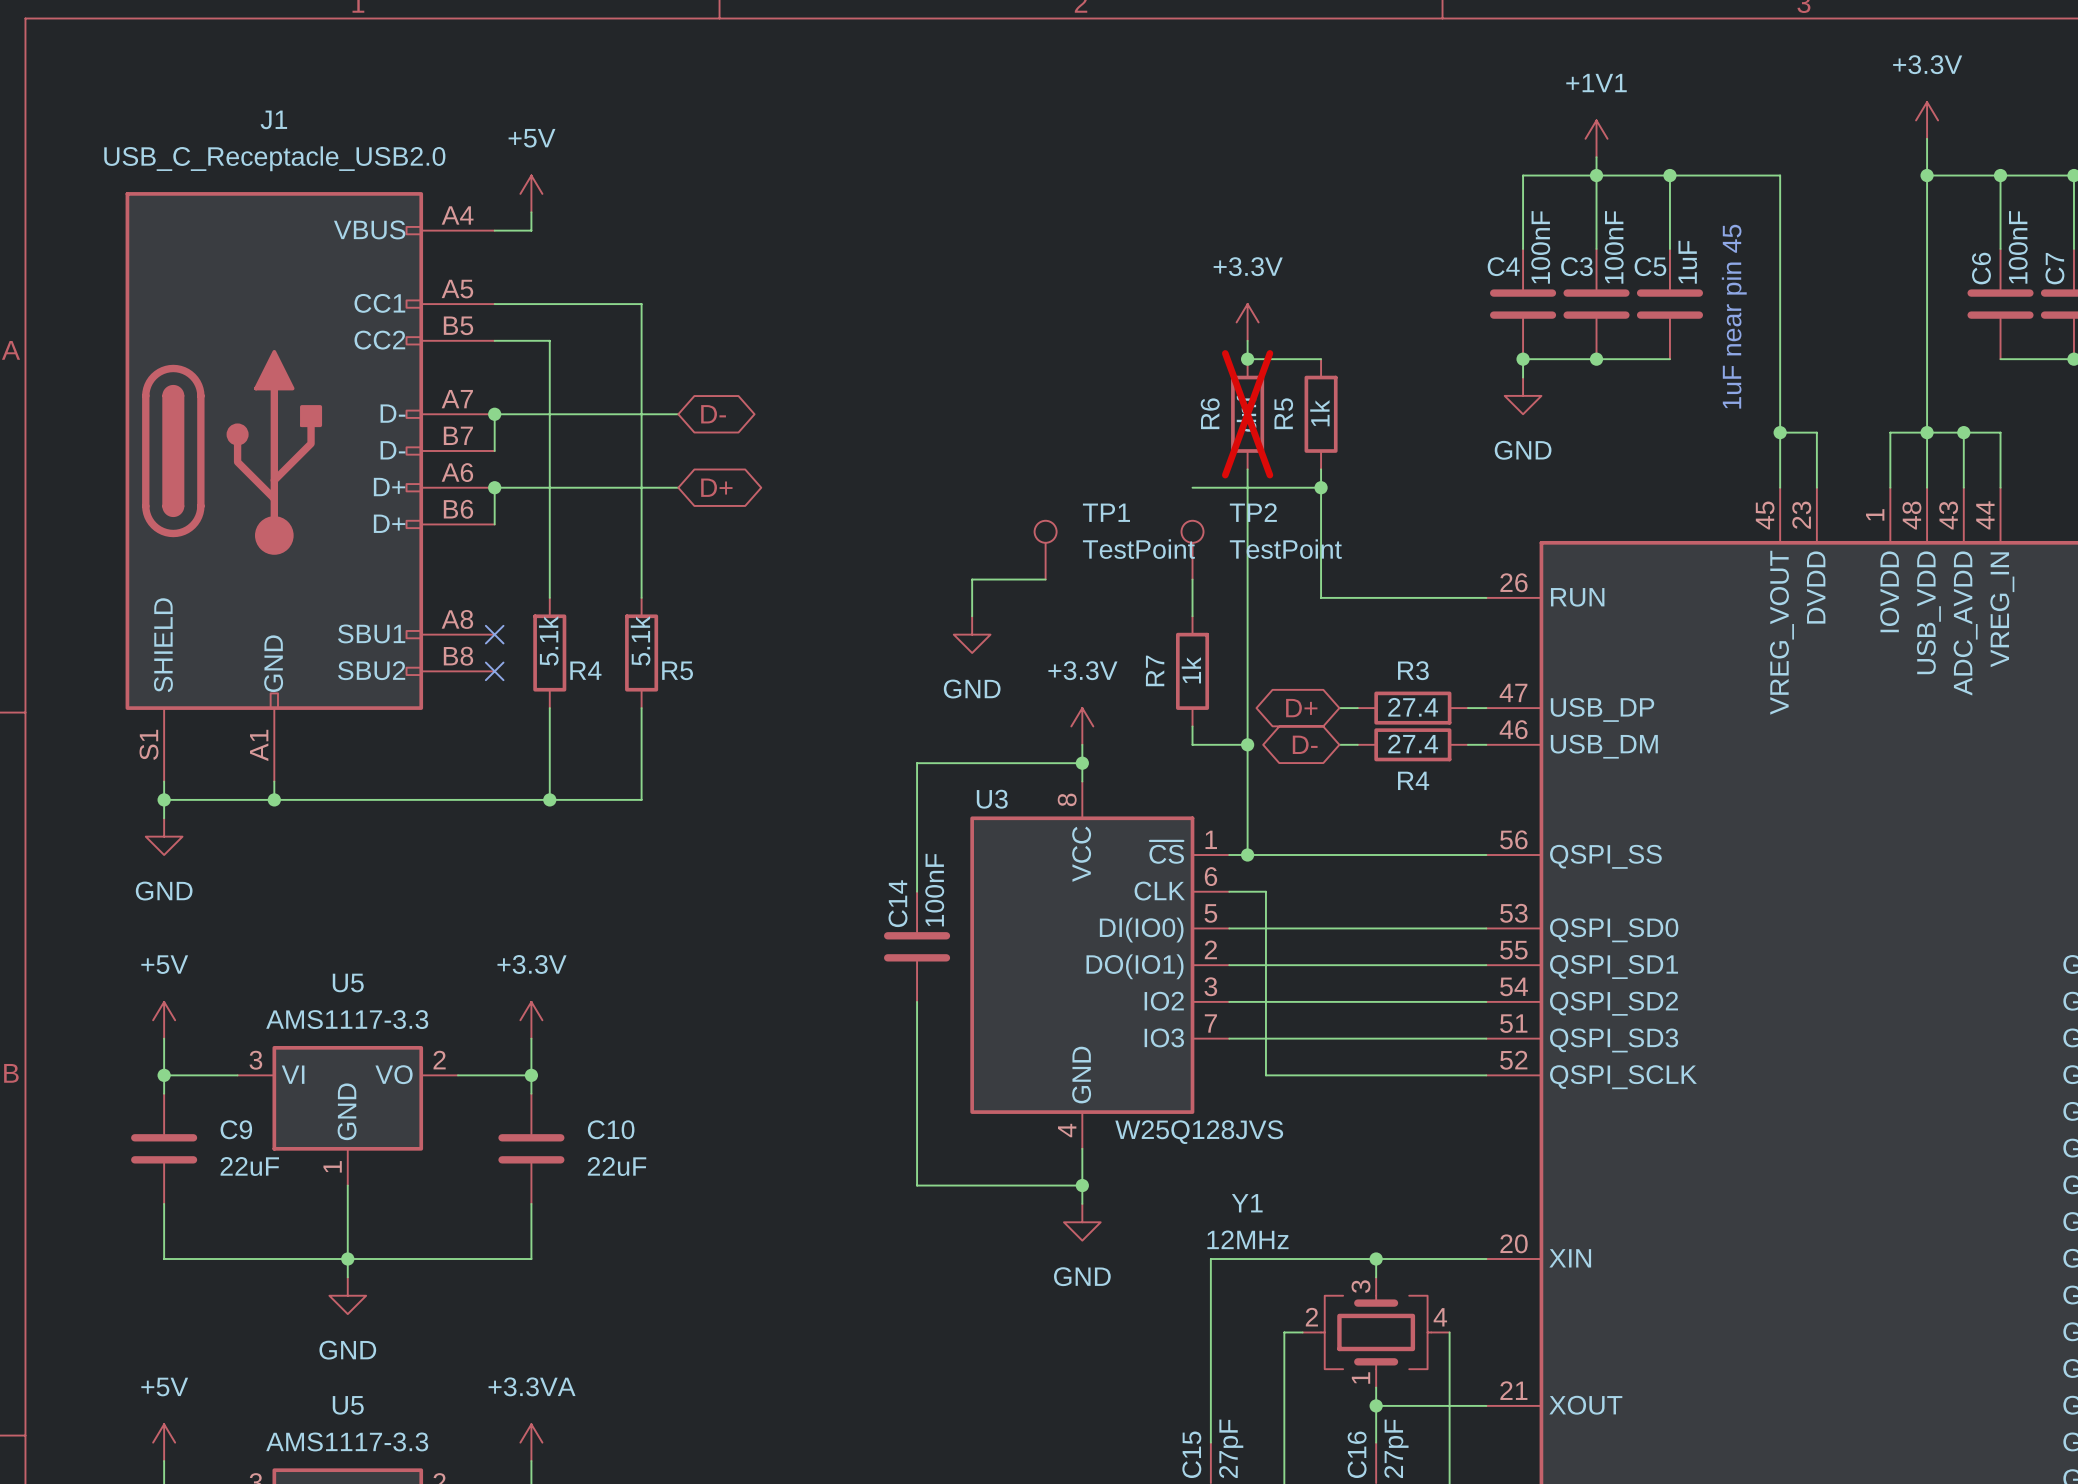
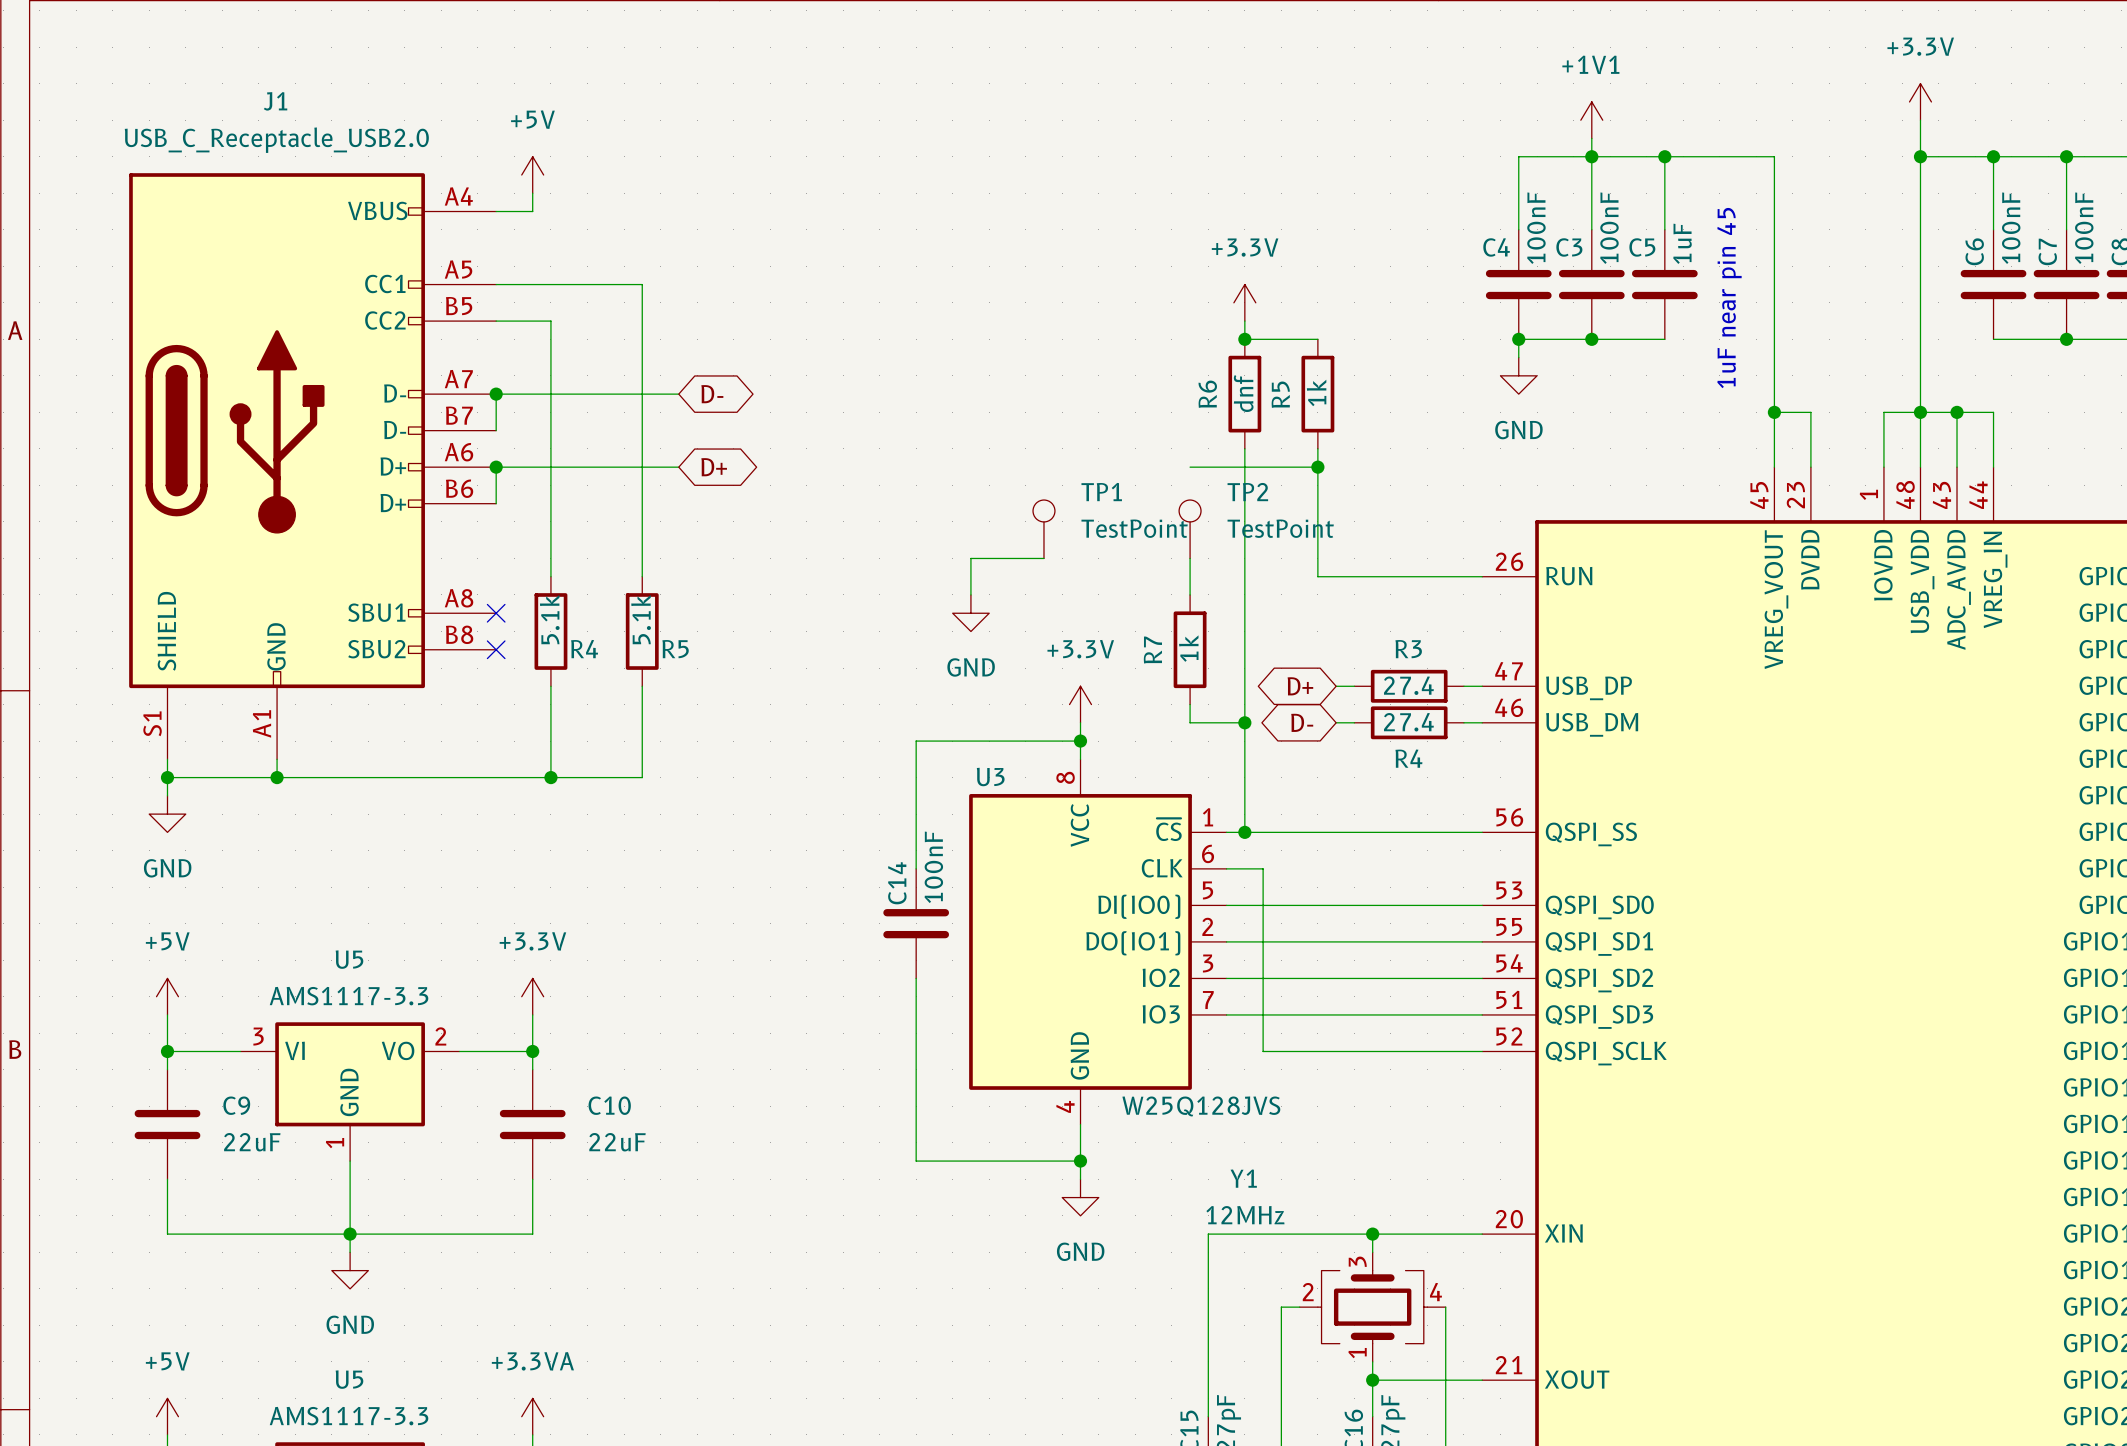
R6 do-not-place cross: (1247, 414) -> none

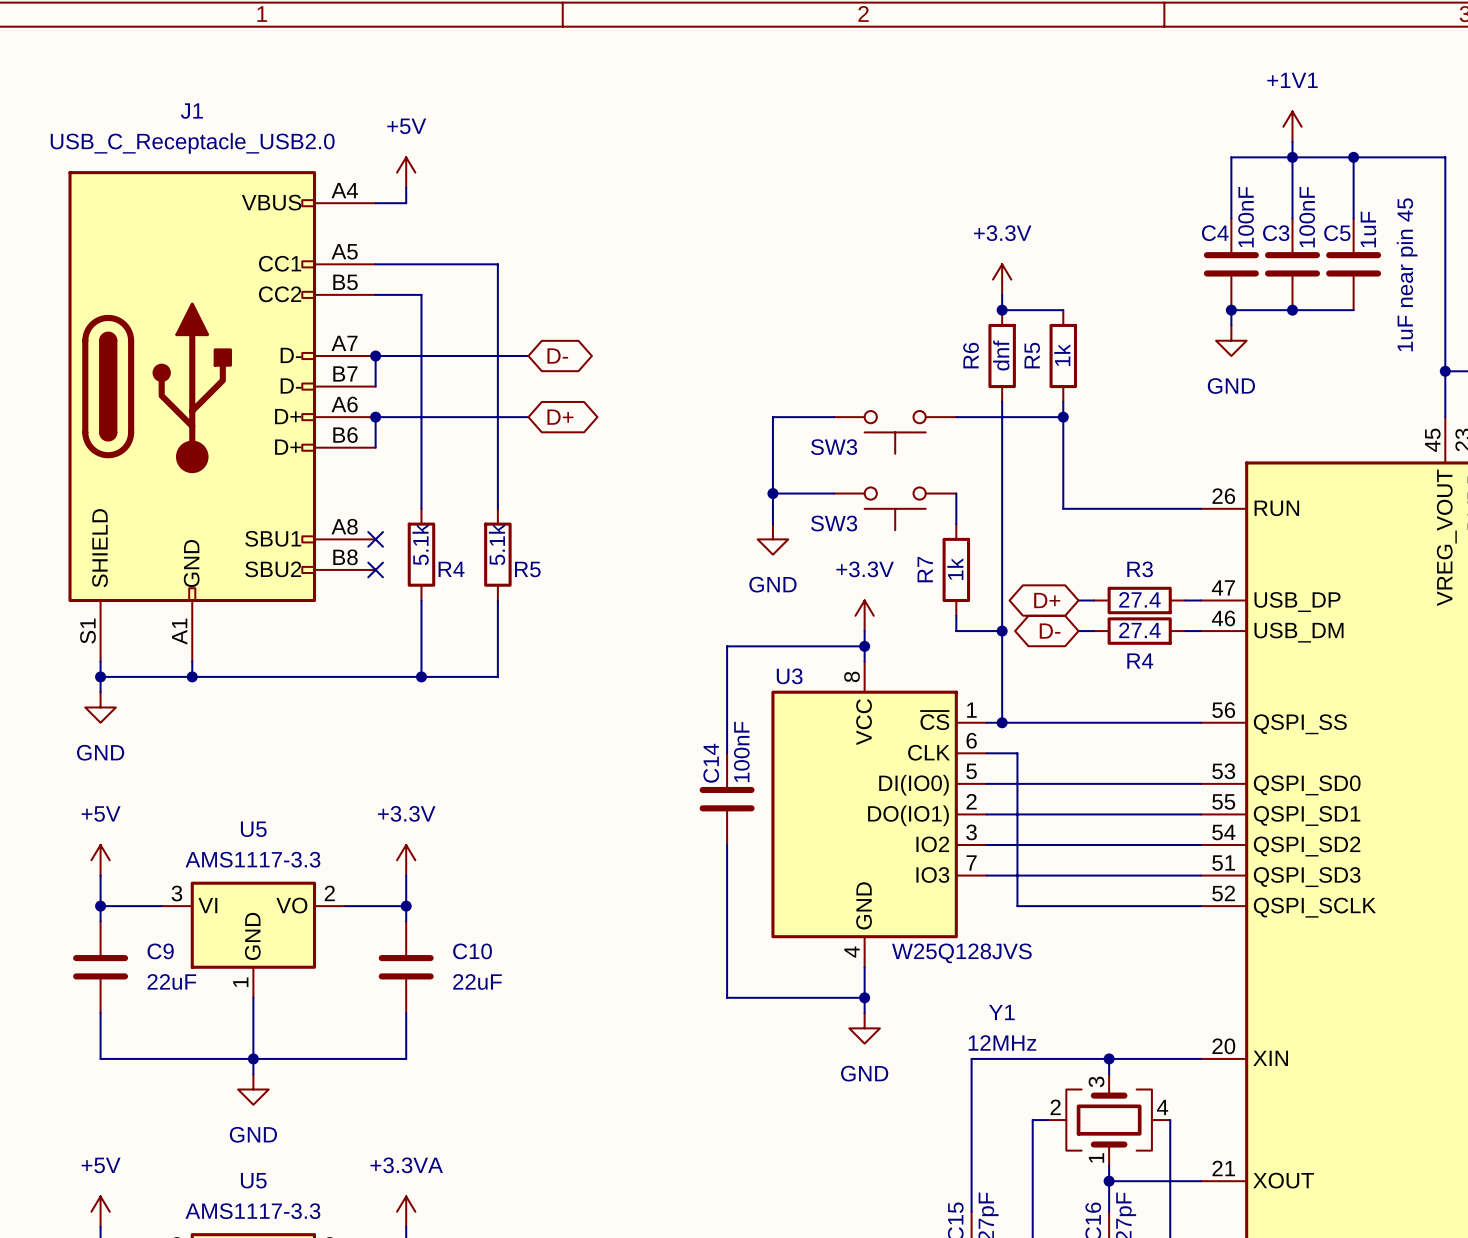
wire: none -> (834, 417) (772, 417) (772, 493)
SW3: none -> (895, 432)
TP1: TestPoint (1043, 529) -> none
TP2: TestPoint (1190, 529) -> none
junction: none -> (772, 493)
SW3: none -> (895, 508)

